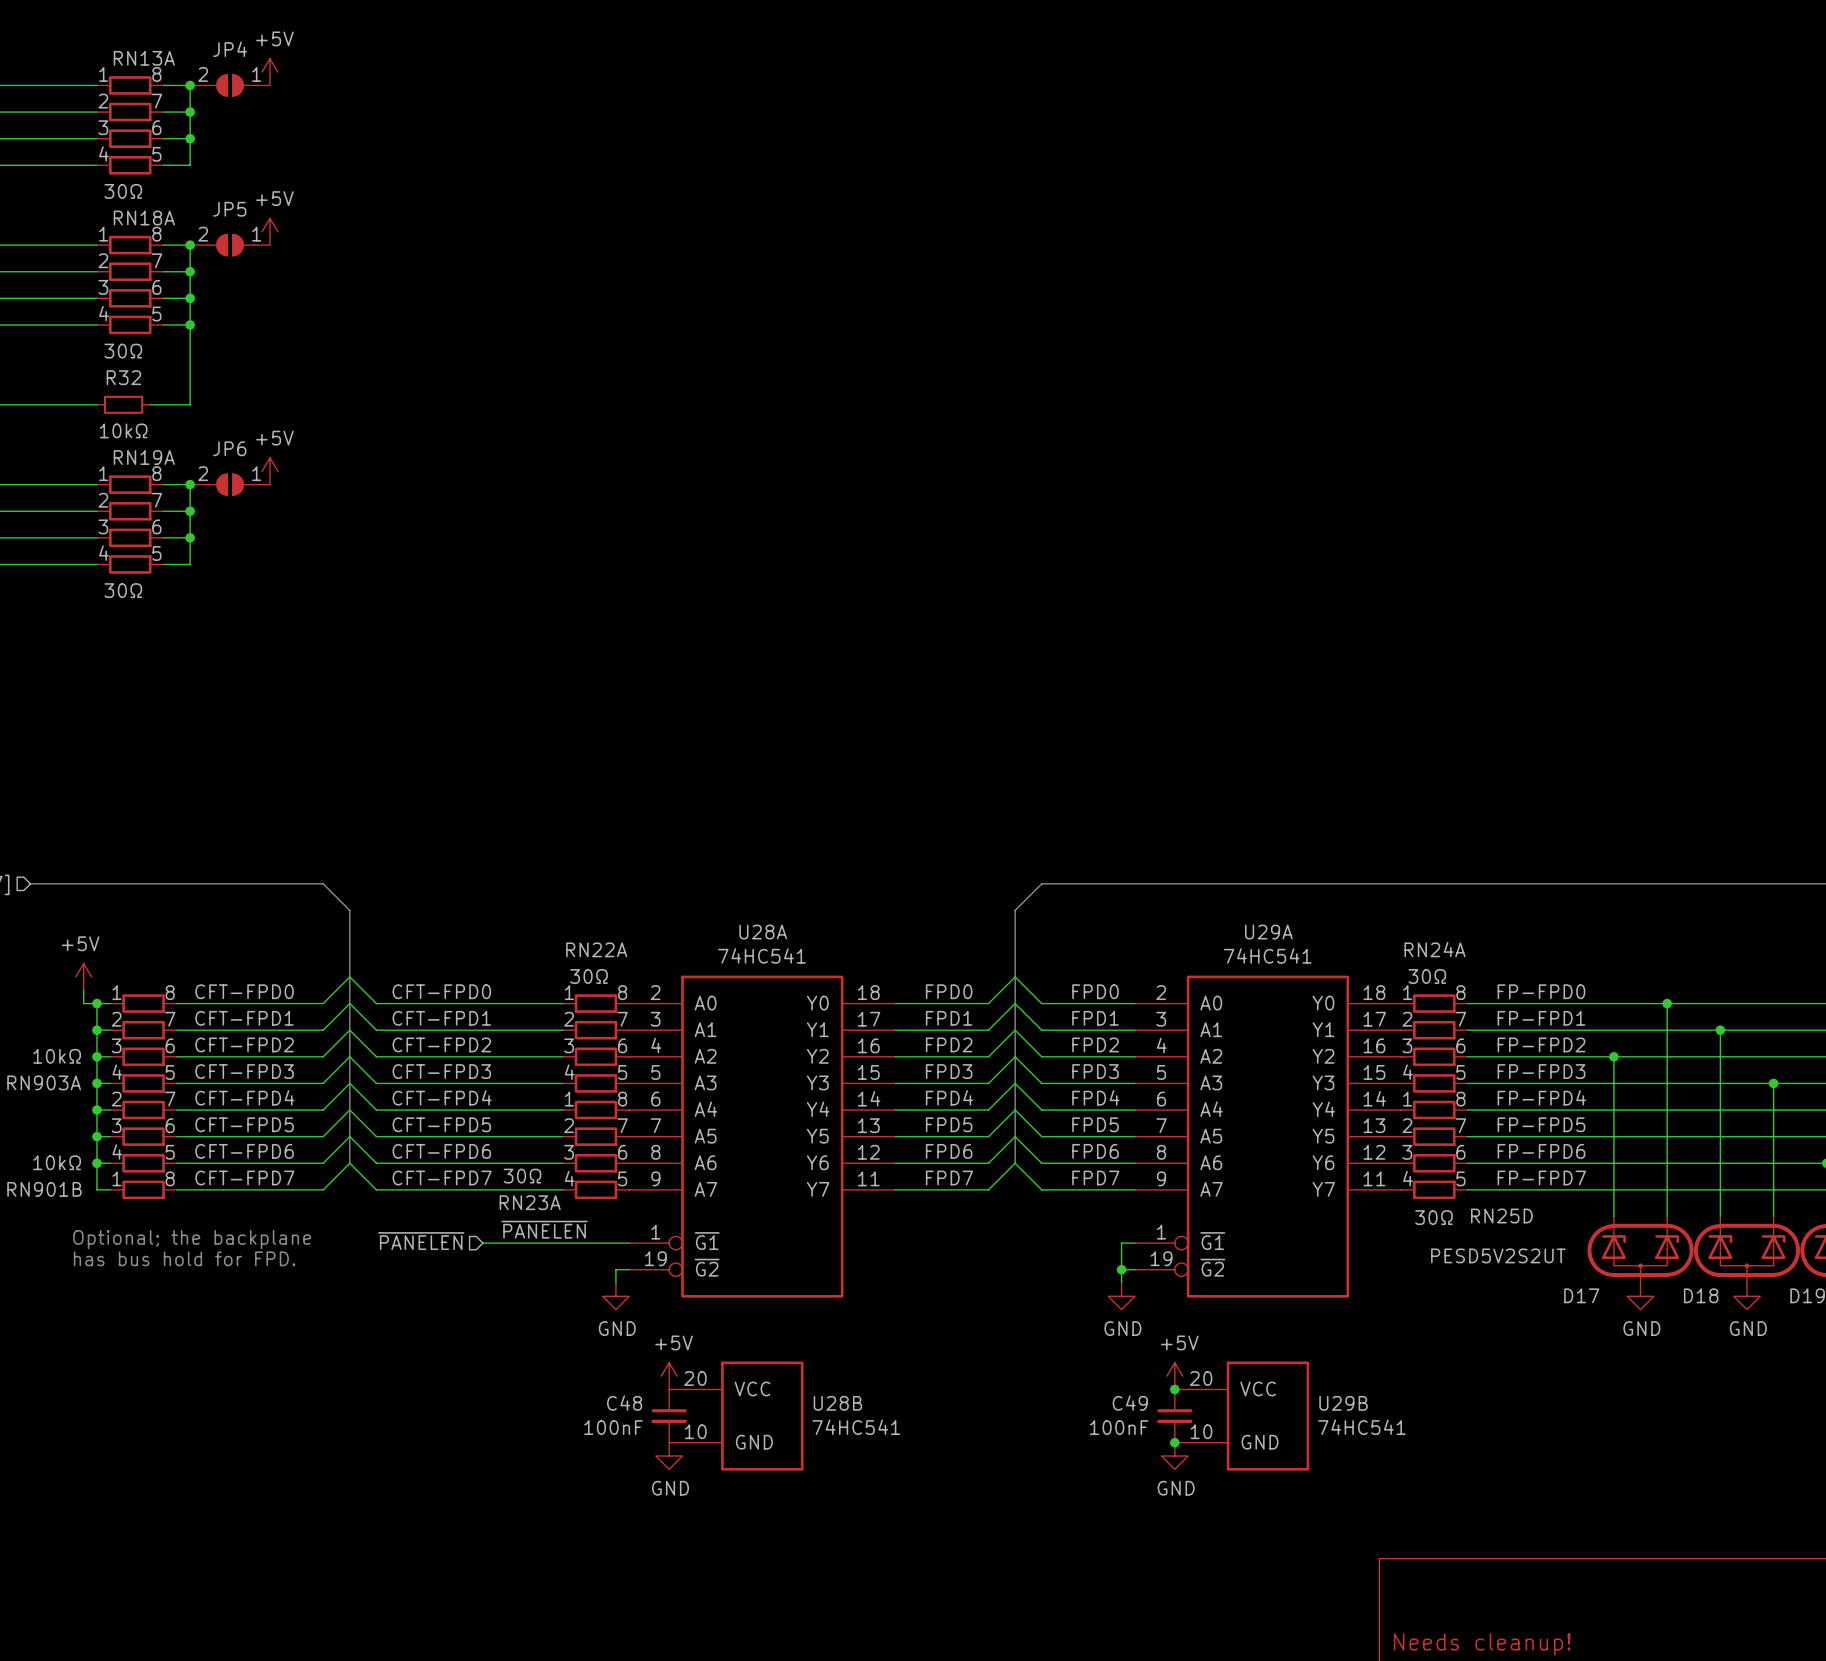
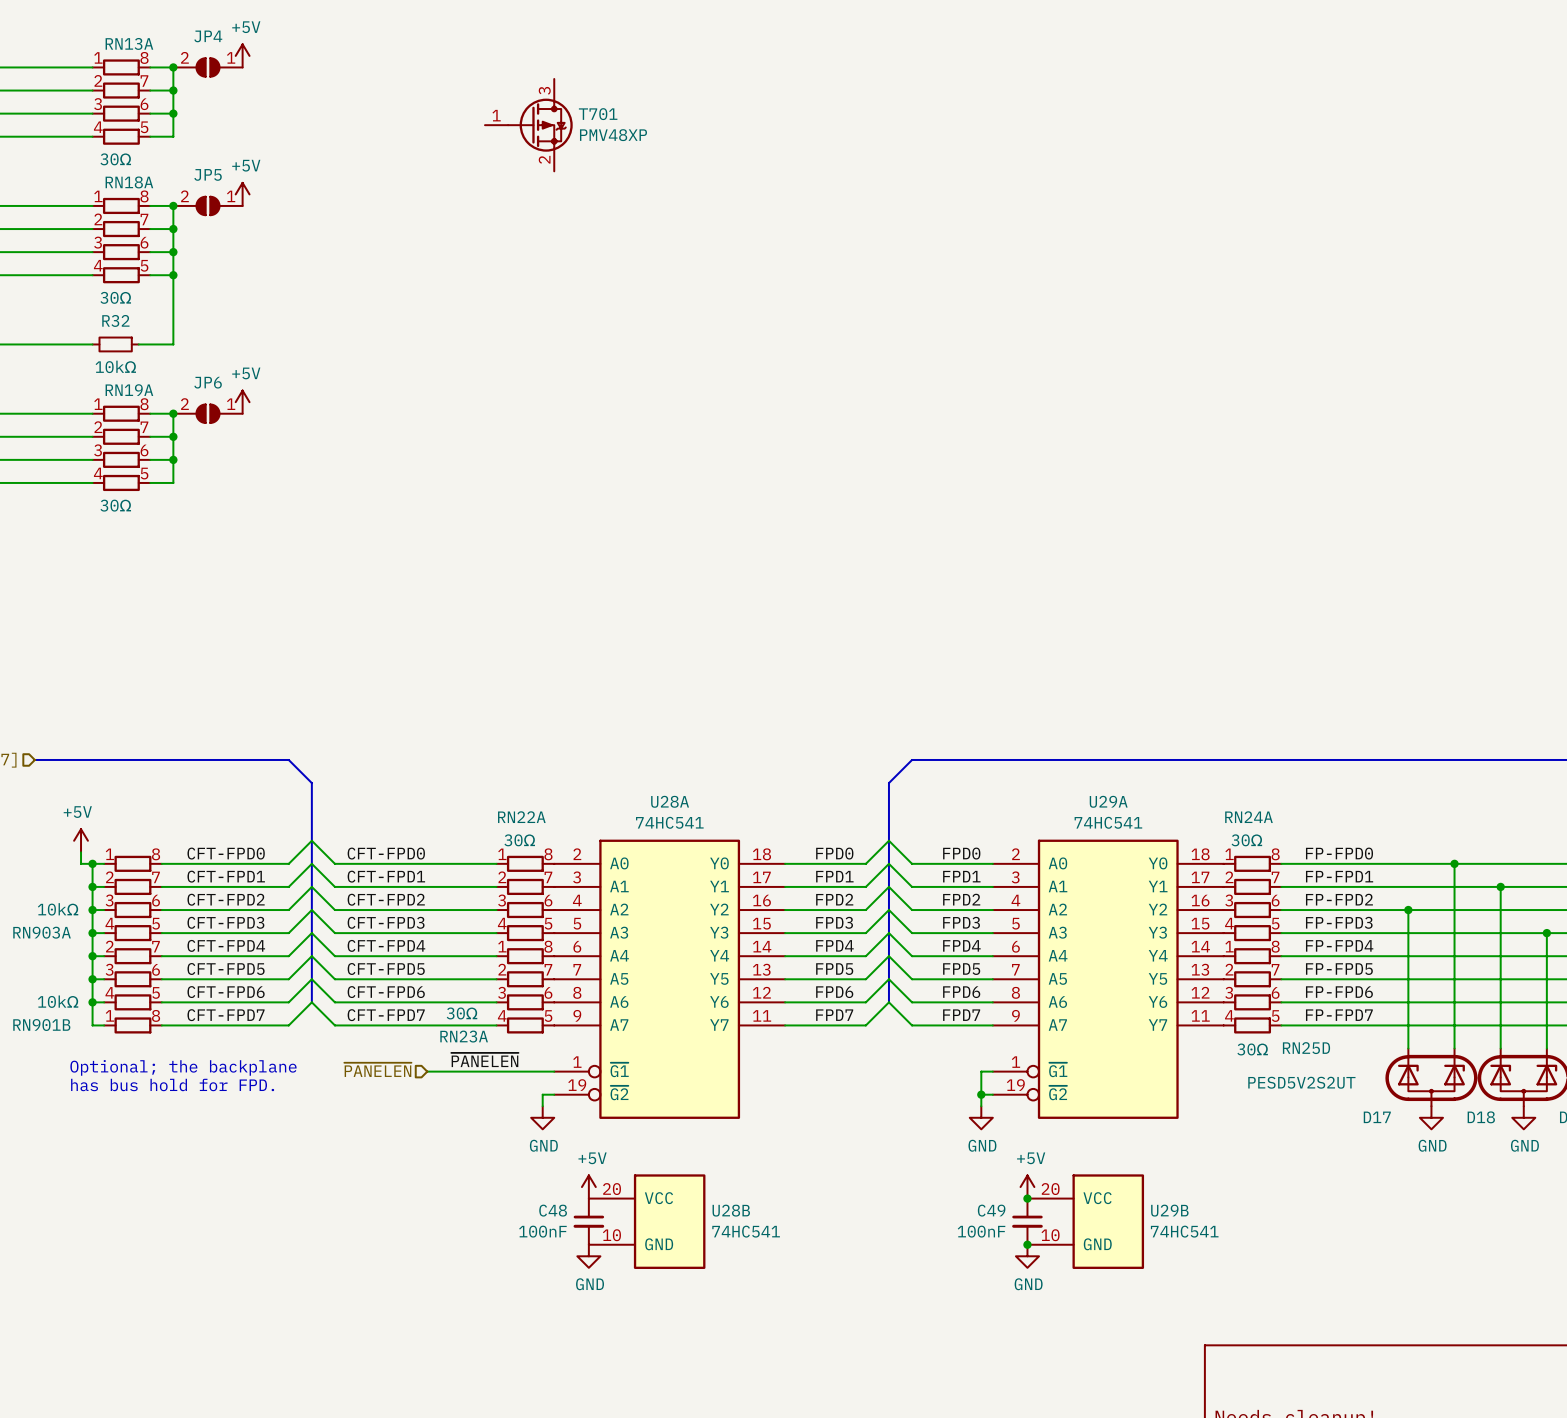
T701: none -> PMV48XP (528, 125)

